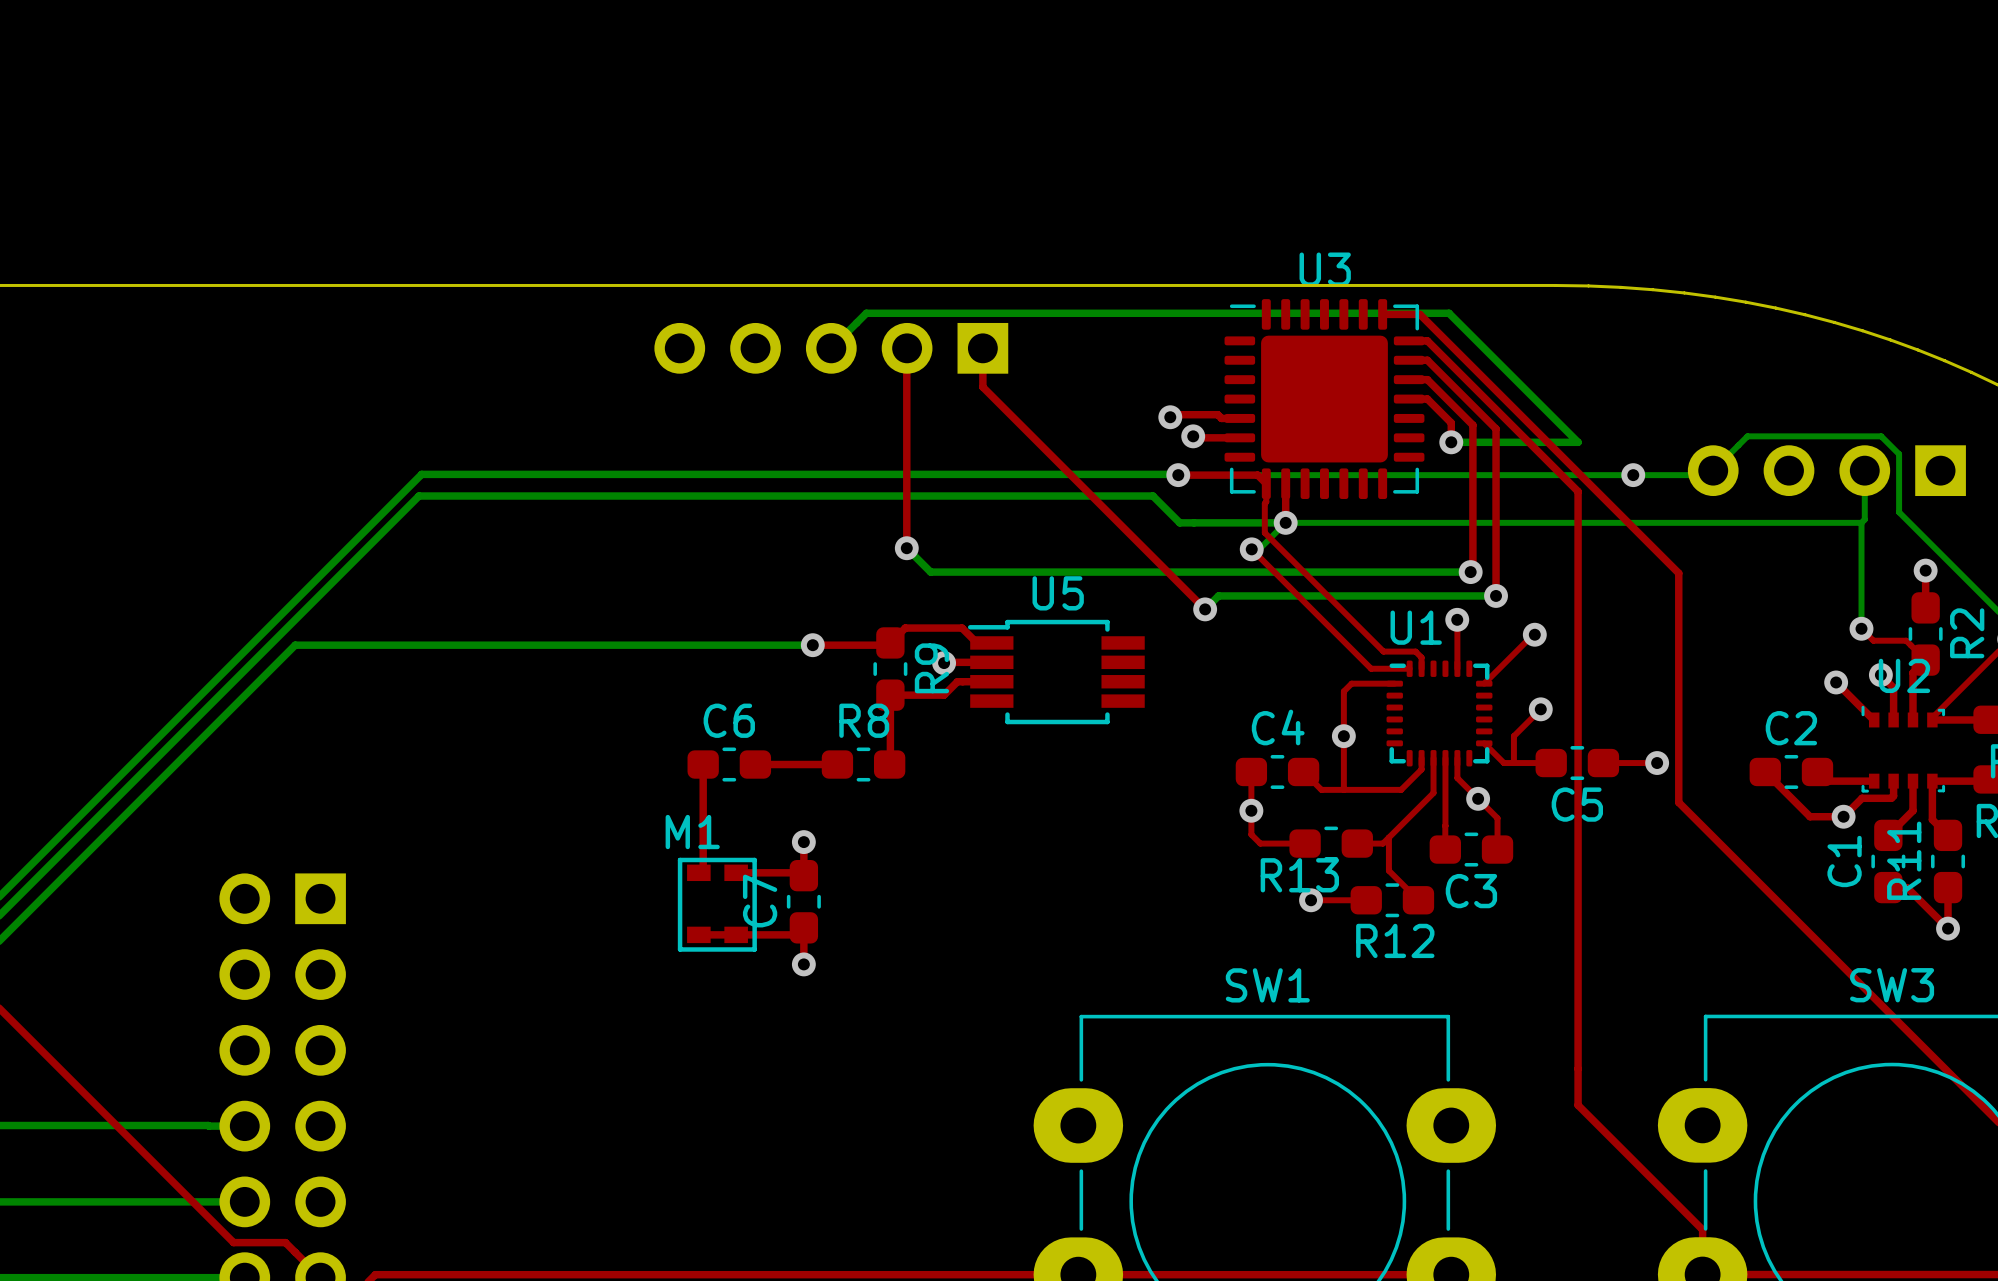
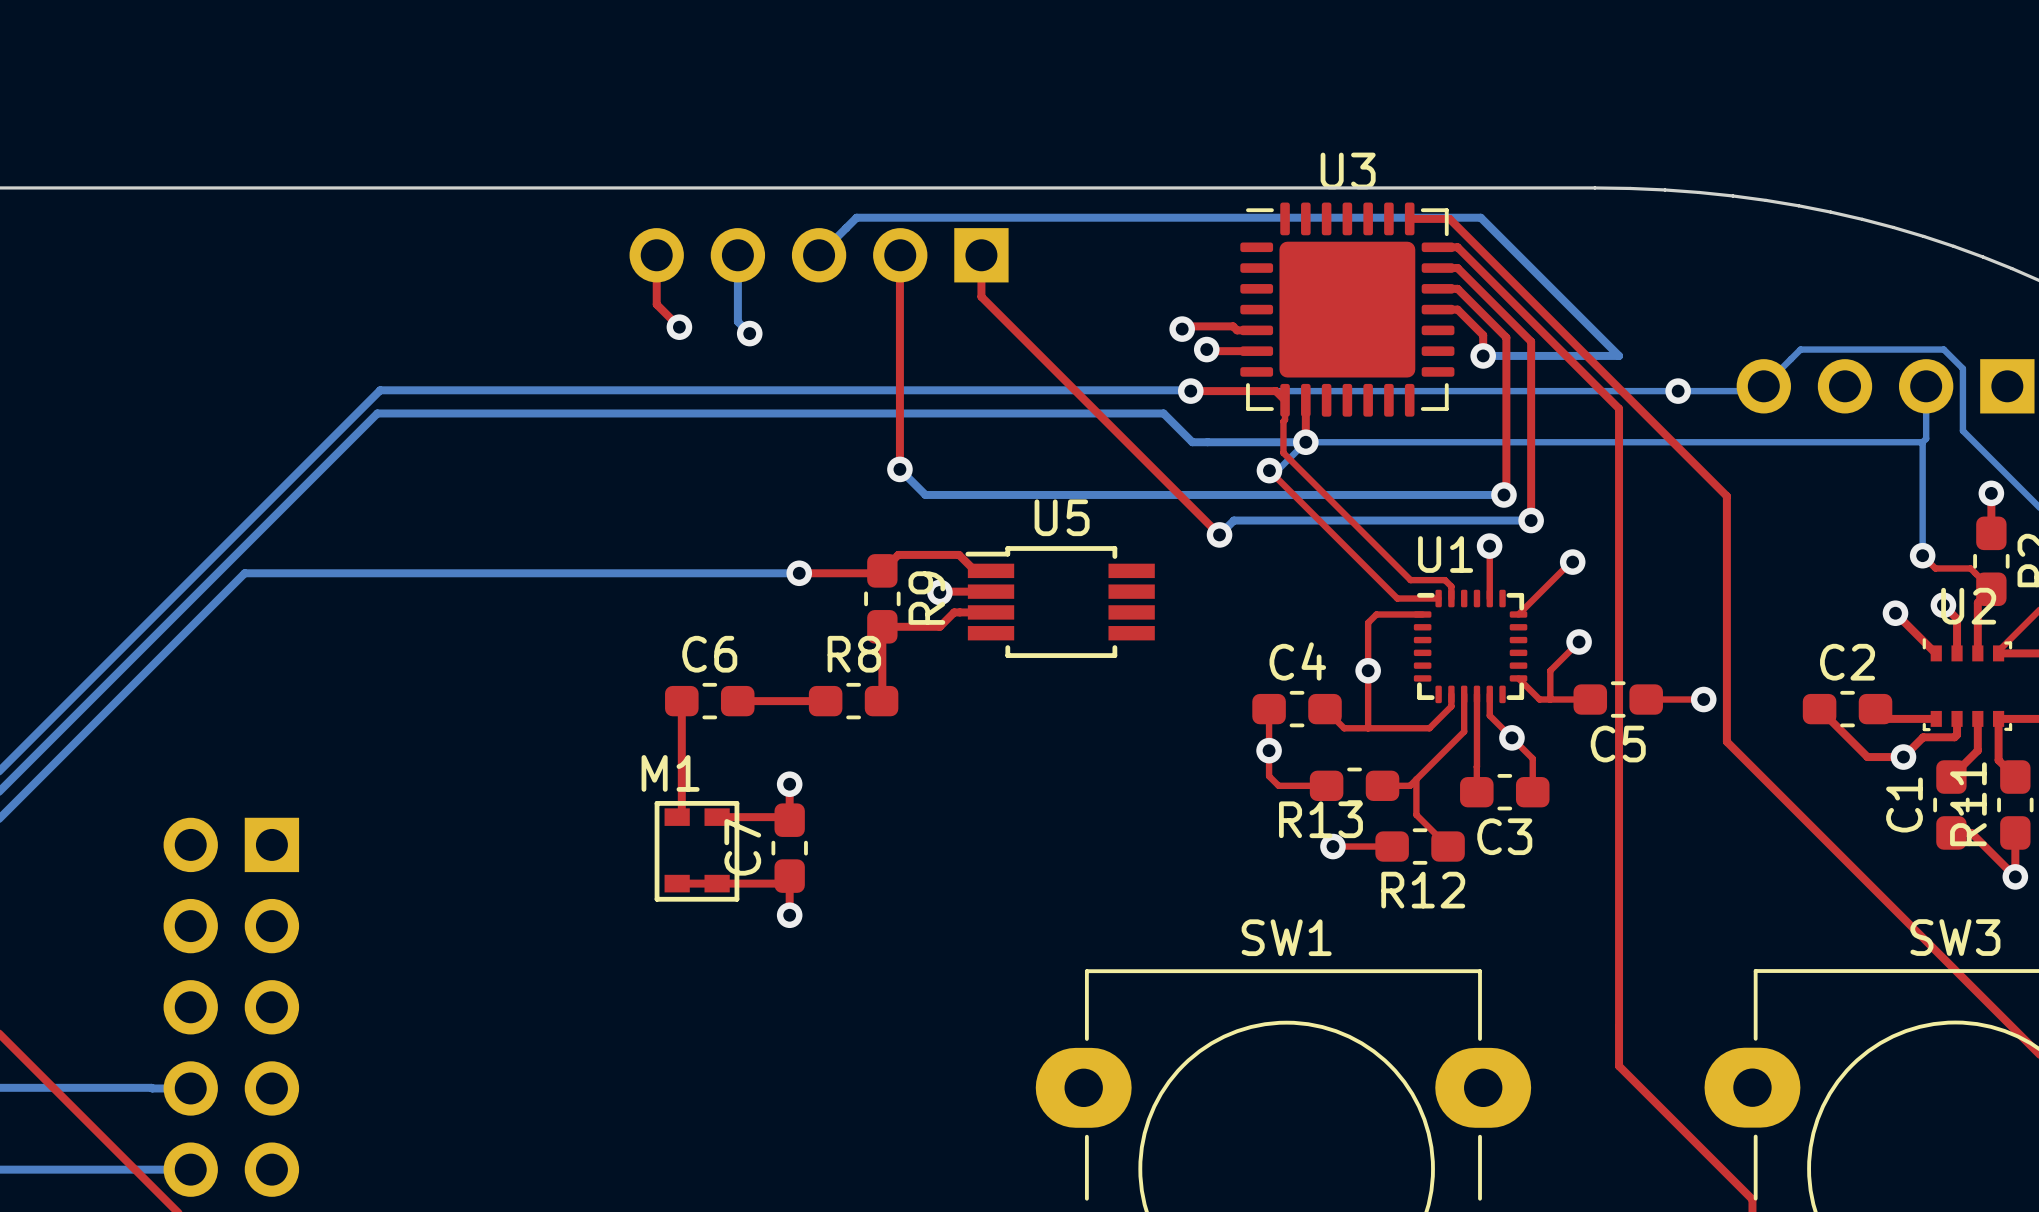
top track: none -> (656, 255) (656, 304) (679, 327)
bottom track: none -> (737, 255) (737, 321) (749, 333)
via: none -> (679, 327)
via: none -> (749, 333)

